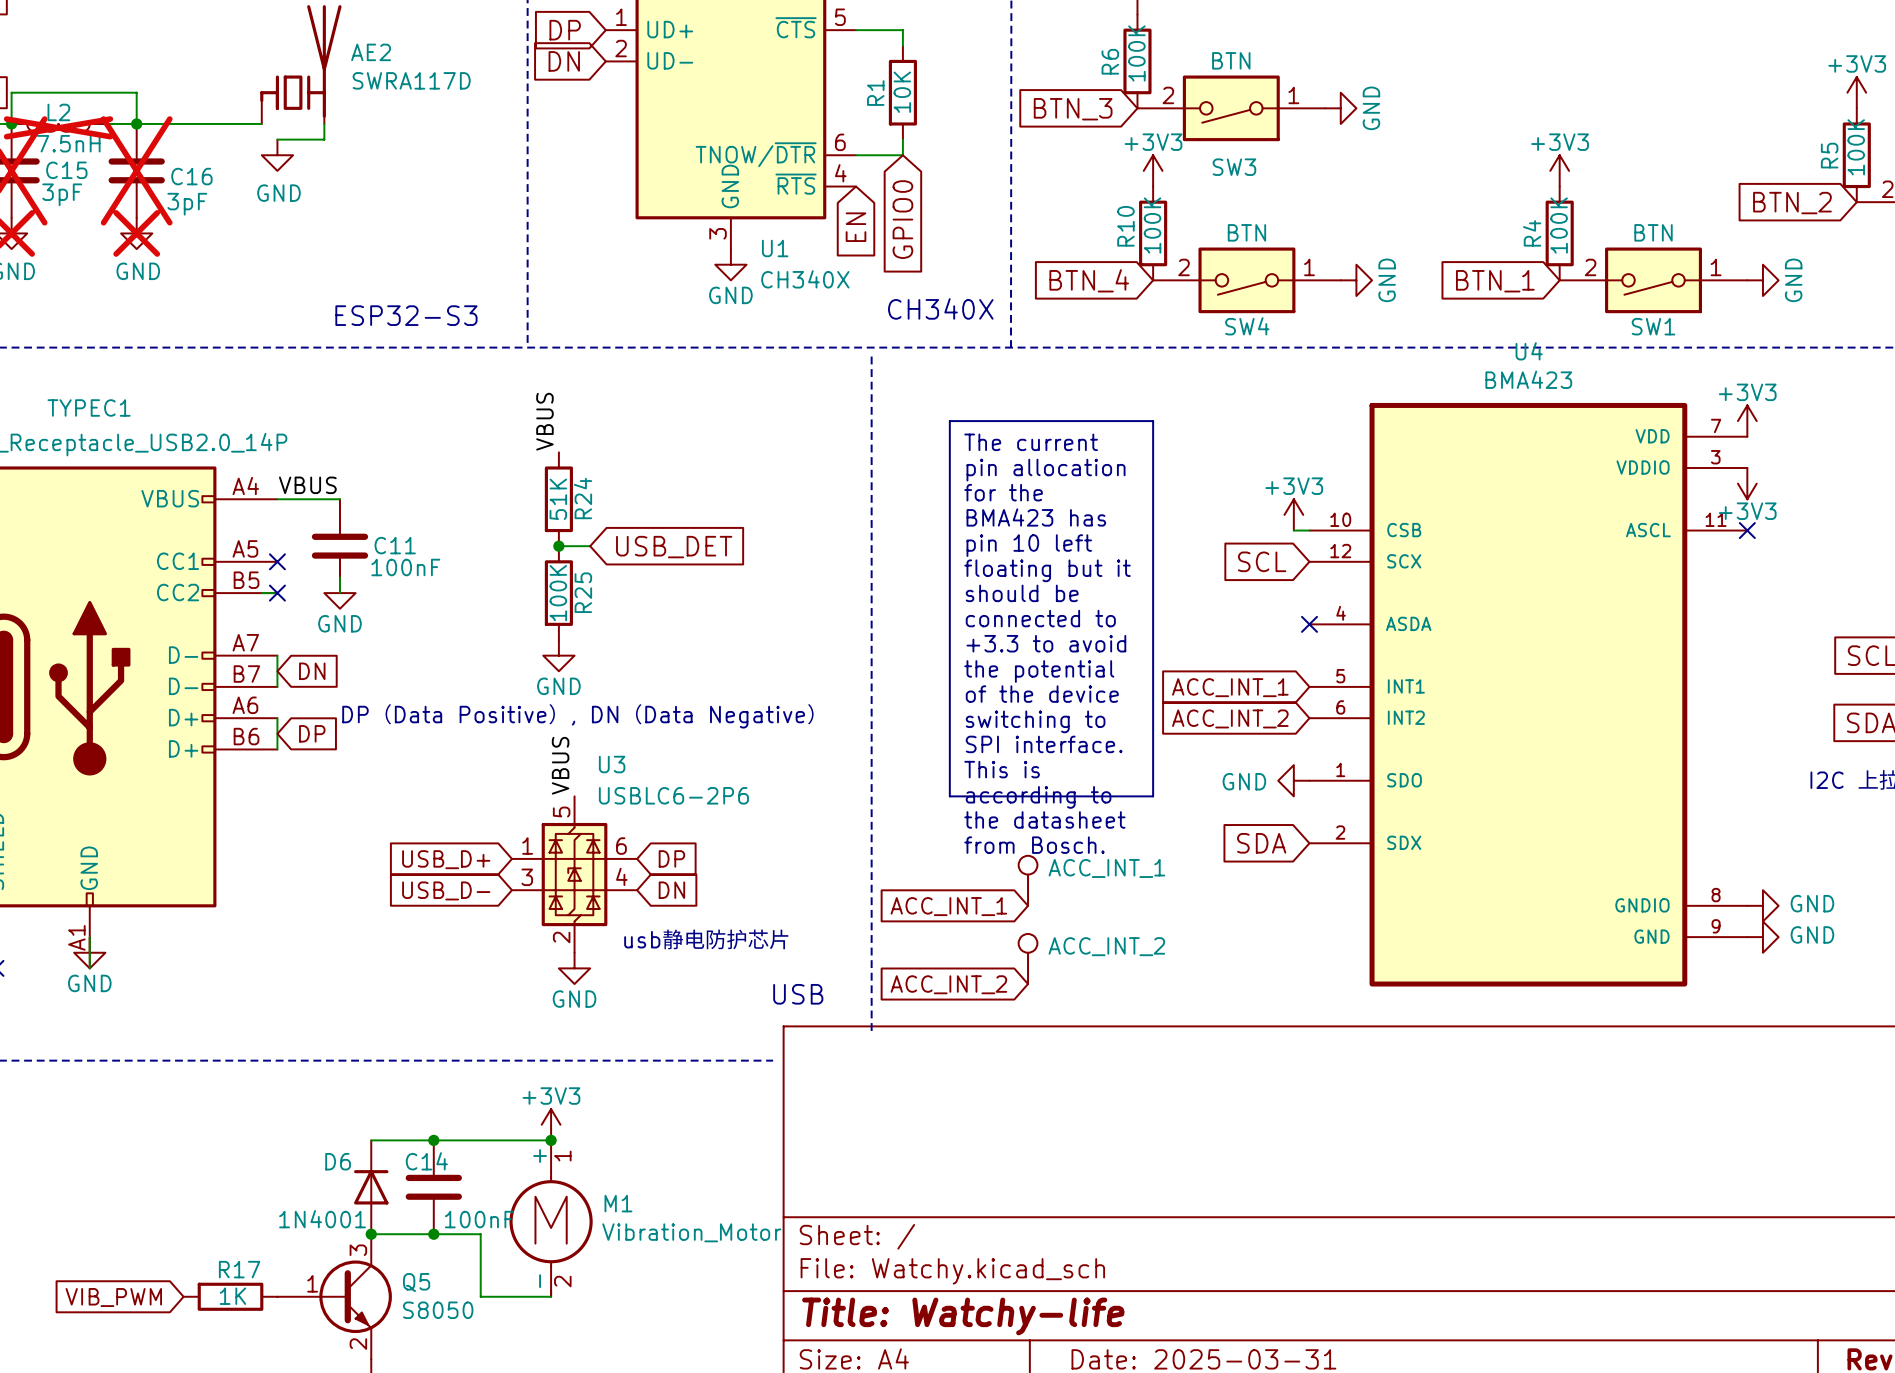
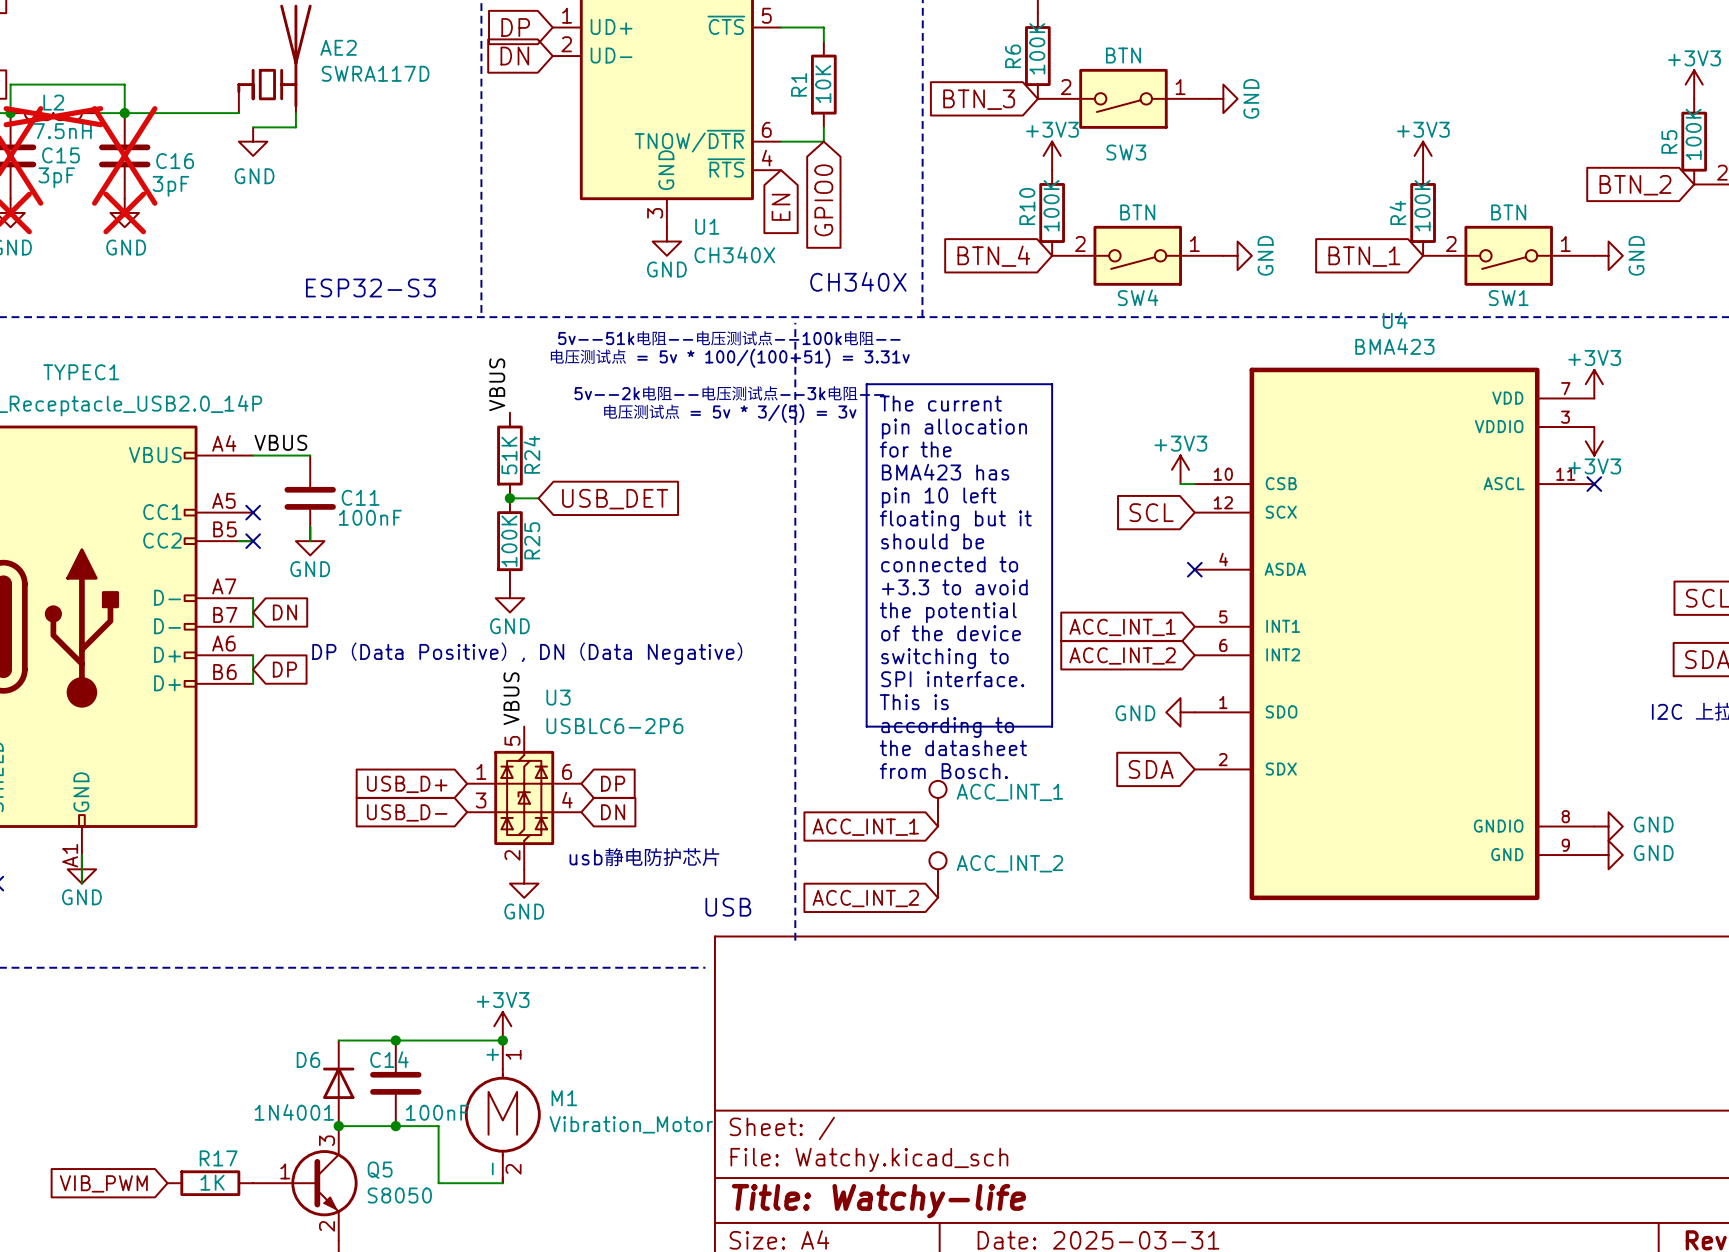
text: none -> 5v--51k电阻--电压测试点--100k电阻-- (729, 338)
text: none -> 电压测试点 = 5v * 100/(100+51) = 3.31v (729, 358)
text: none -> 5v--2k电阻--电压测试点--3k电阻-- (729, 393)
text: none -> 电压测试点 = 5v * 3/(5) = 3v (729, 413)

